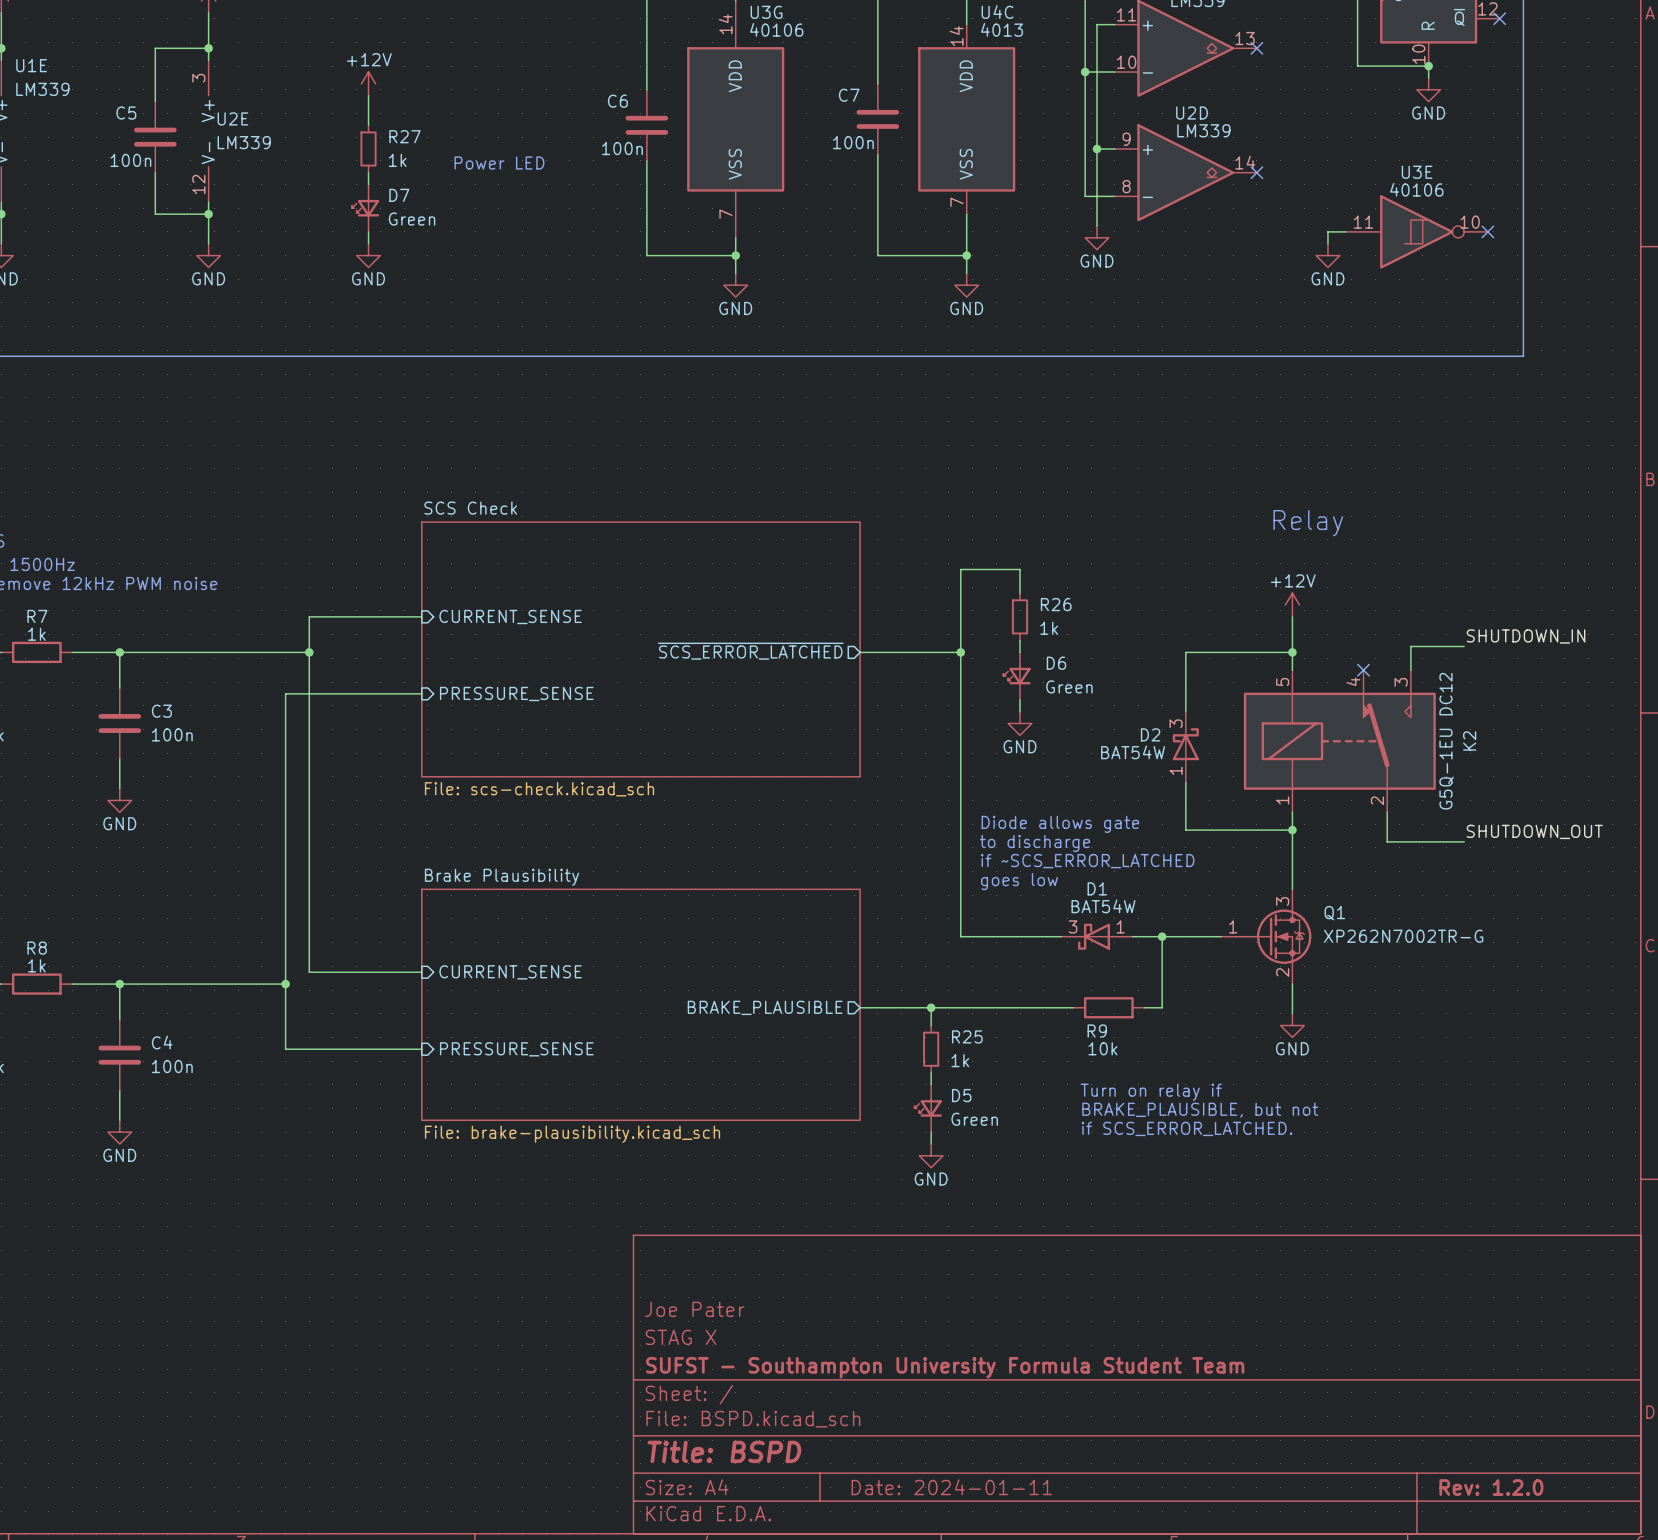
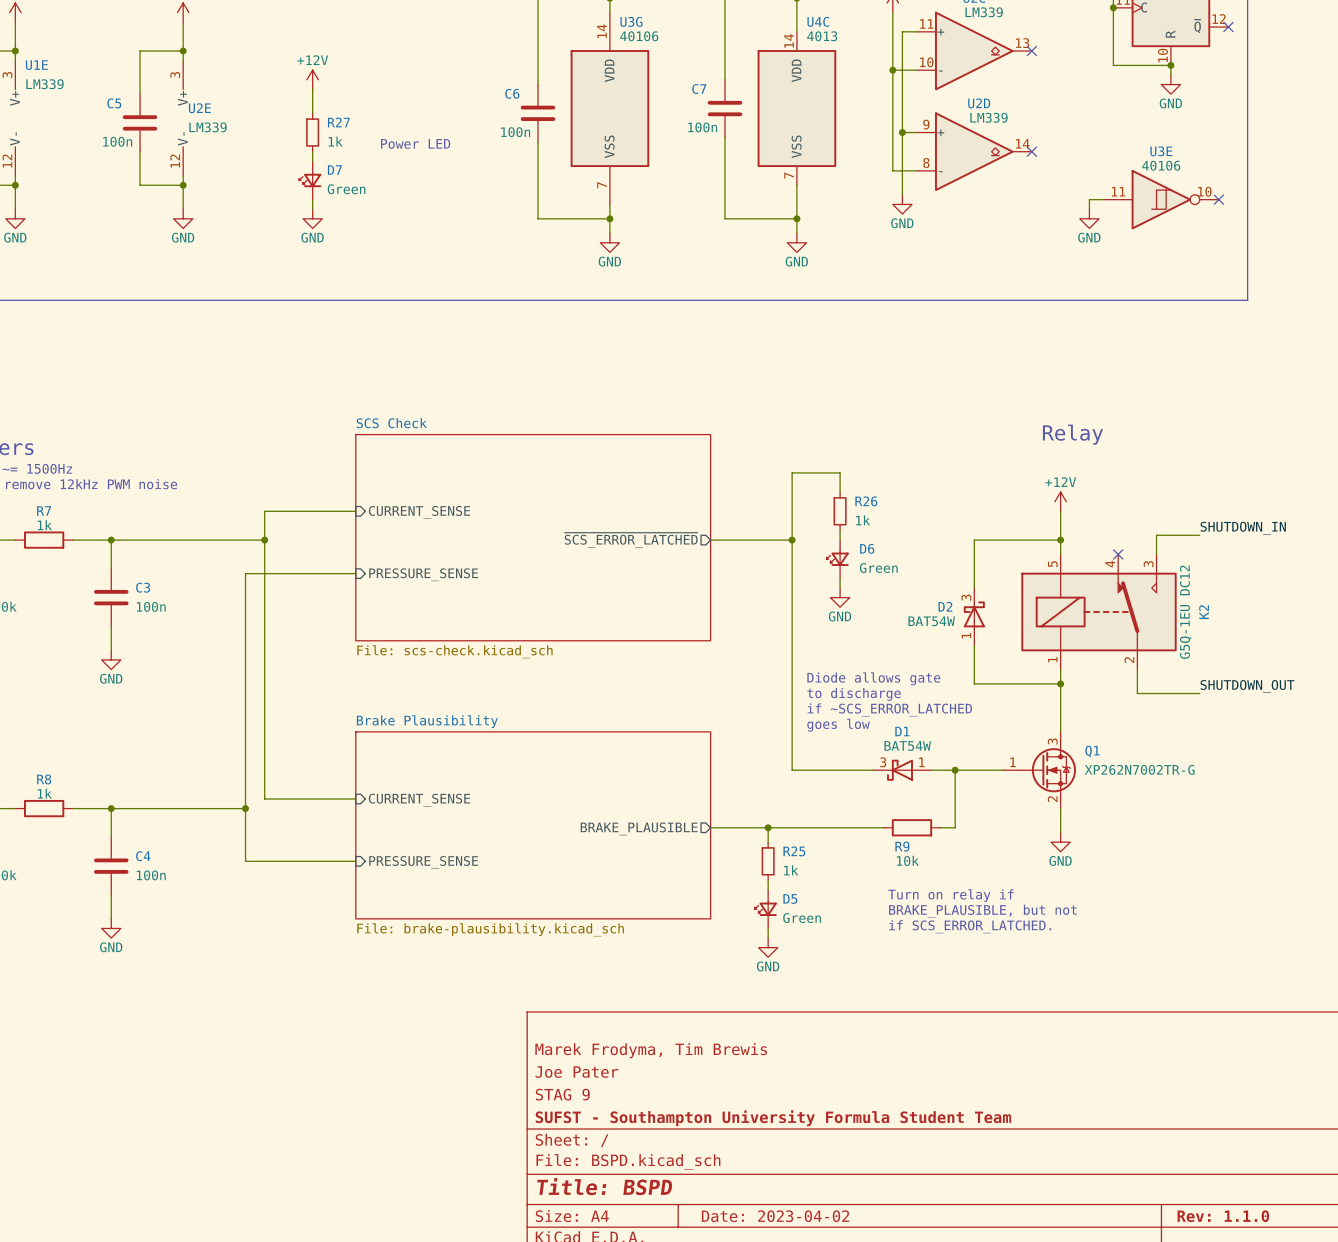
title block: none -> Marek Frodyma, Tim Brewis (651, 1050)
title block: STAG X (681, 1337) -> STAG 9 (562, 1094)
title block: Date: 2024-01-11 (951, 1487) -> Date: 2023-04-02 (775, 1216)
title block: Rev: 1.2.0 (1491, 1487) -> Rev: 1.1.0 (1223, 1216)

